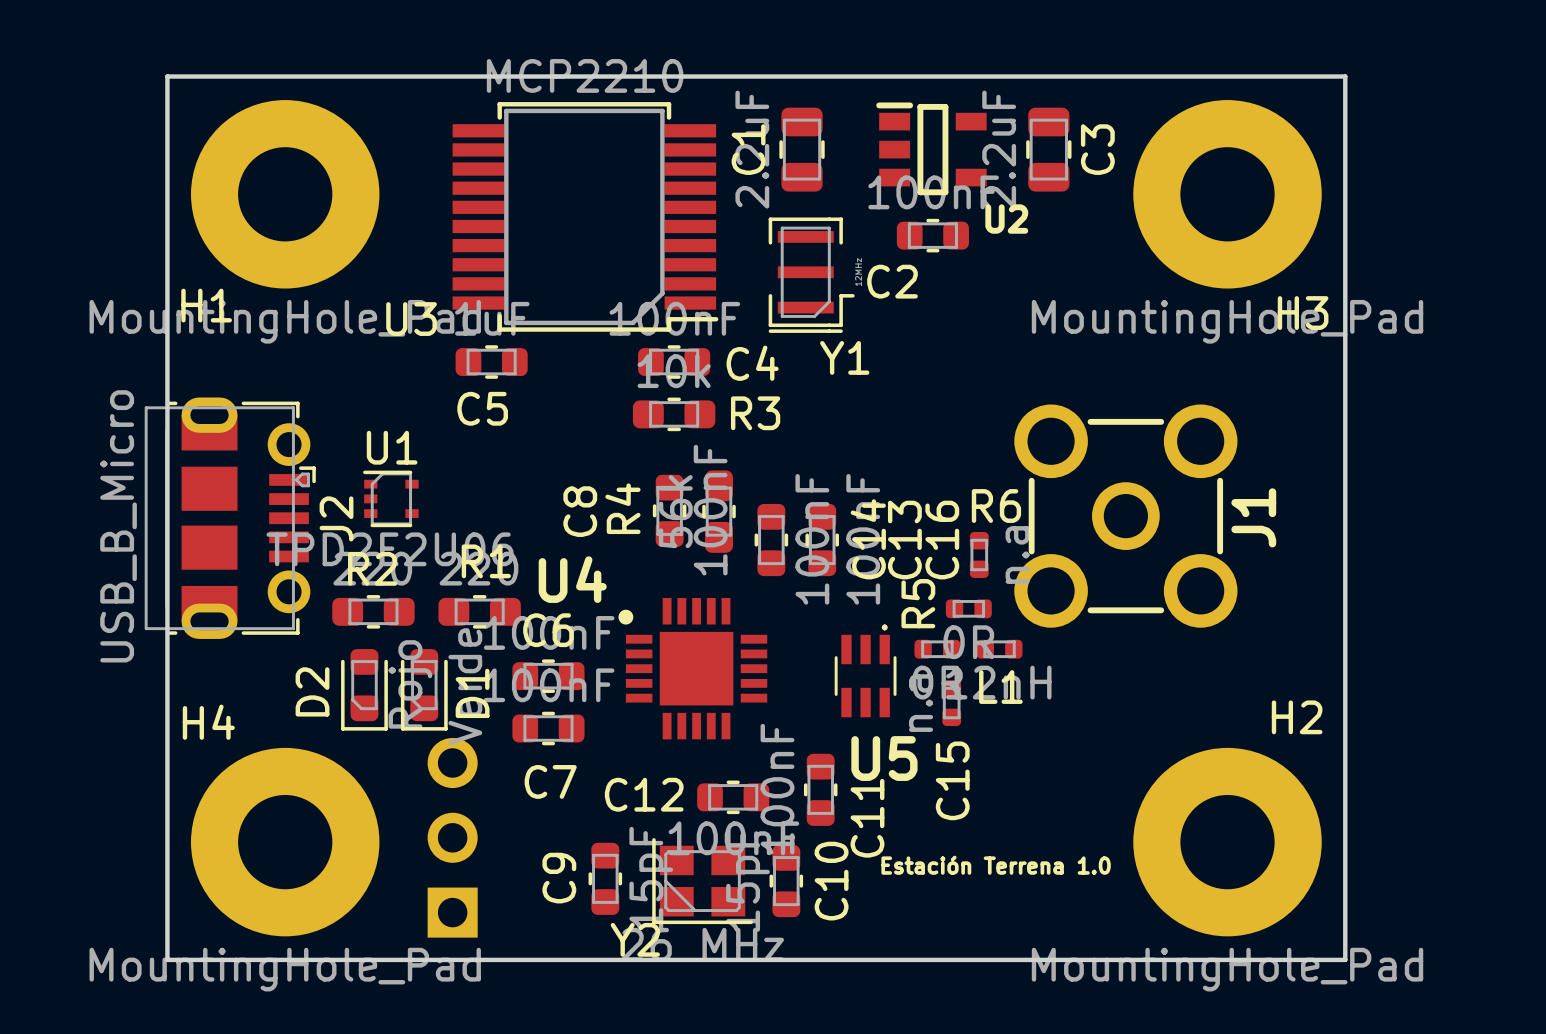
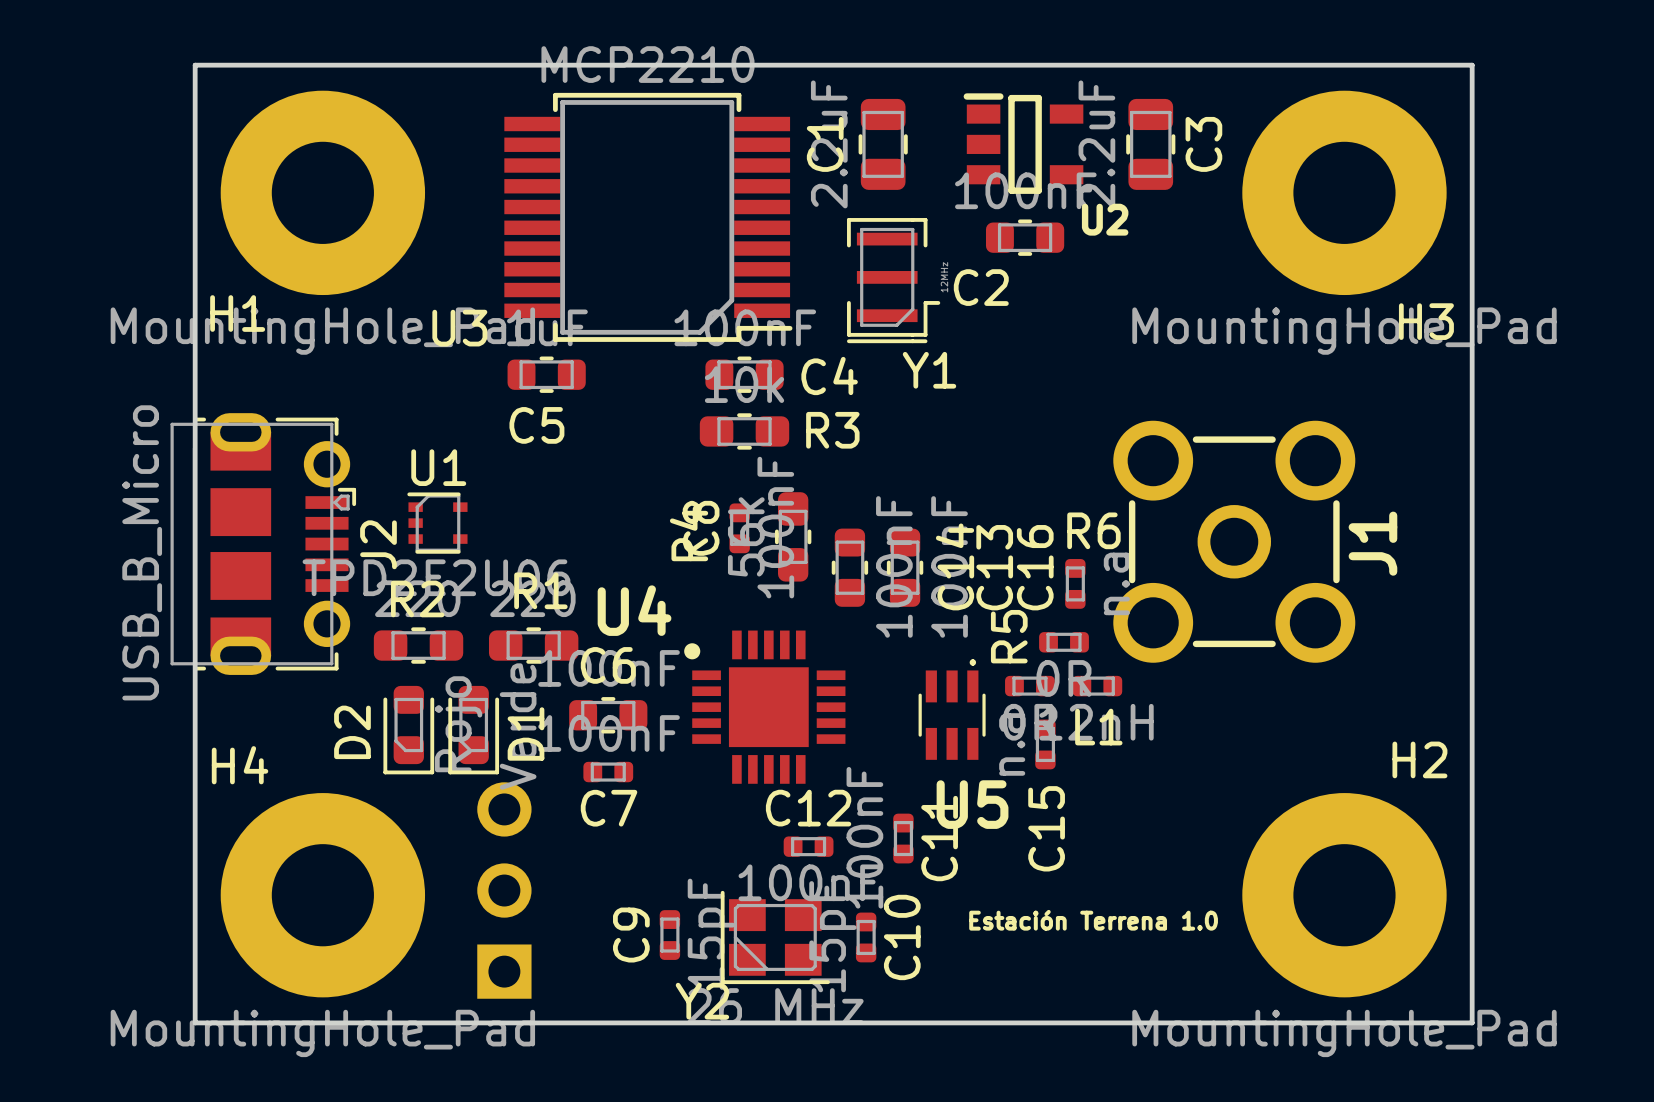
C8 footprint: [652, 474, 687, 547] -> [729, 503, 750, 554]
C7 footprint: [512, 711, 585, 746] -> [583, 761, 634, 783]
C11 footprint: [803, 753, 838, 826] -> [893, 813, 914, 864]
C12 footprint: [697, 780, 770, 815] -> [783, 836, 834, 857]
C12 name position: C12 (644, 794) -> C12 (808, 808)
C9 footprint: [588, 842, 623, 915] -> [659, 910, 681, 960]
C10 footprint: [769, 845, 804, 918] -> [855, 912, 877, 963]

